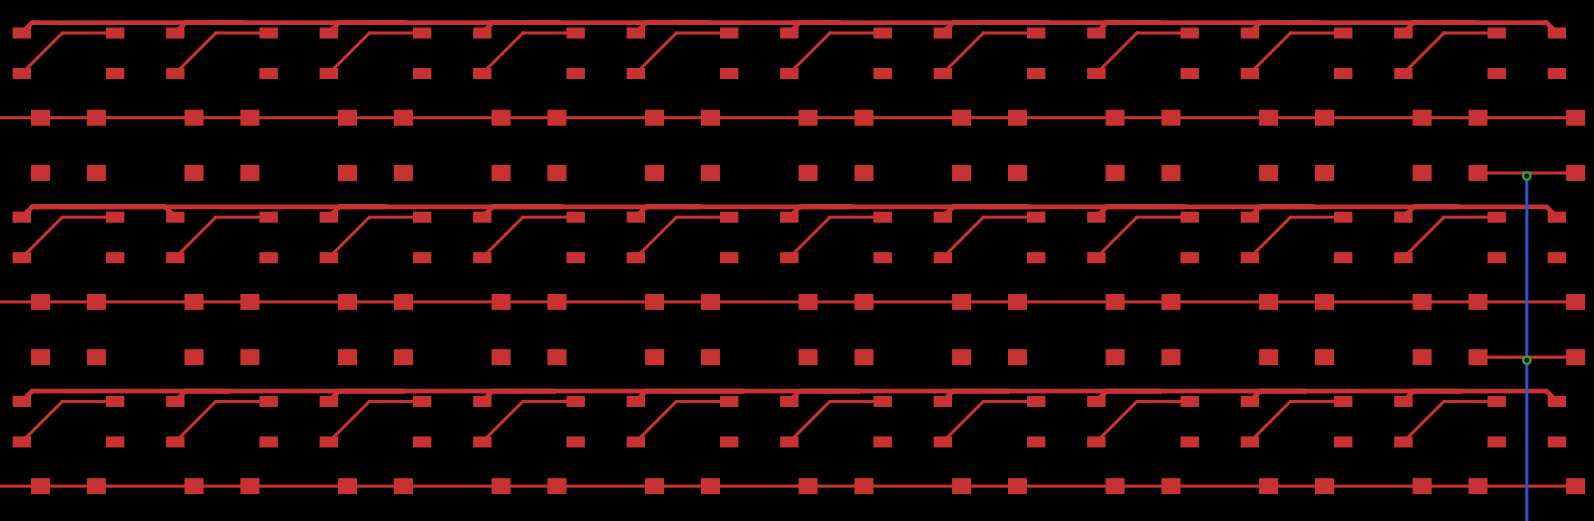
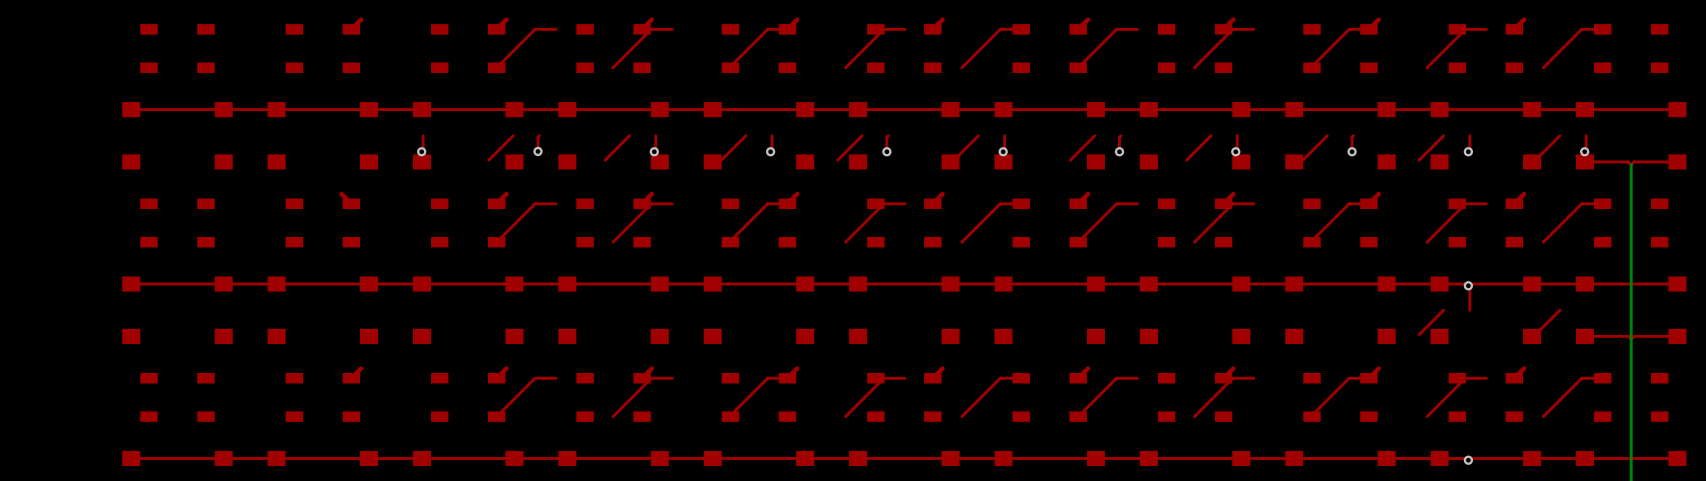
top track: (115, 32) (62, 32) (21, 73) -> none
top track: (268, 32) (215, 32) (175, 73) -> none
top track: (422, 32) (391, 32) -> none
top track: none -> (672, 29) (651, 29) (613, 67)
top track: (575, 32) (522, 32) (482, 73) -> none
top track: none -> (788, 29) (767, 29) (729, 67)
top track: (729, 32) (676, 32) (635, 73) -> none
top track: none -> (904, 29) (883, 29) (845, 67)
top track: (860, 32) (829, 32) (789, 73) -> (1000, 29) (961, 67)
top track: (1036, 32) (1005, 32) -> none
top track: none -> (1253, 29) (1232, 29) (1194, 67)
top track: (1189, 32) (1136, 32) (1096, 73) -> none
top track: none -> (1370, 29) (1349, 29) (1310, 67)
top track: (1343, 32) (1290, 32) (1249, 73) -> none
top track: none -> (1486, 29) (1465, 29) (1427, 67)
top track: (1474, 32) (1443, 32) (1403, 73) -> (1581, 29) (1543, 67)
top track: (1556, 32) (1546, 22) (32, 22) (21, 32) -> none
top track: none -> (423, 135) (421, 151)
top track: none -> (513, 135) (488, 160)
top track: none -> (539, 135) (537, 151)
top track: none -> (629, 135) (605, 160)
top track: none -> (655, 135) (654, 151)
top track: none -> (745, 135) (721, 160)
top track: none -> (772, 135) (770, 151)
top track: none -> (862, 135) (837, 160)
top track: none -> (888, 135) (886, 151)
top track: none -> (978, 135) (954, 160)
top track: none -> (1004, 135) (1003, 151)
top track: none -> (1094, 135) (1070, 160)
top track: none -> (1120, 135) (1119, 151)
top track: none -> (1211, 135) (1186, 160)
top track: none -> (1237, 135) (1235, 151)
top track: none -> (1327, 135) (1302, 160)
top track: none -> (1353, 135) (1352, 151)
top track: none -> (1443, 135) (1419, 160)
top track: none -> (1469, 135) (1468, 151)
top track: none -> (1559, 135) (1535, 160)
top track: none -> (1586, 135) (1584, 151)
via: none -> (537, 151)
via: none -> (421, 151)
via: none -> (654, 151)
via: none -> (770, 151)
via: none -> (886, 151)
via: none -> (1003, 151)
via: none -> (1119, 151)
via: none -> (1235, 151)
via: none -> (1352, 151)
via: none -> (1468, 151)
via position: (1526, 176) -> (1584, 151)
top track: (115, 217) (62, 217) (21, 257) -> none
top track: (268, 217) (215, 217) (175, 257) -> none
top track: (422, 217) (391, 217) -> none
top track: none -> (672, 203) (651, 203) (613, 242)
top track: (575, 217) (522, 217) (482, 257) -> none
top track: none -> (788, 203) (767, 203) (729, 242)
top track: (729, 217) (676, 217) (635, 257) -> none
top track: none -> (904, 203) (883, 203) (845, 242)
top track: (860, 217) (829, 217) (789, 257) -> (1000, 203) (961, 242)
top track: (1036, 217) (1005, 217) -> none
top track: none -> (1253, 203) (1232, 203) (1194, 242)
top track: (1189, 217) (1136, 217) (1096, 257) -> none
top track: none -> (1370, 203) (1349, 203) (1310, 242)
top track: (1343, 217) (1290, 217) (1249, 257) -> none
top track: none -> (1486, 203) (1465, 203) (1427, 242)
top track: (1474, 217) (1443, 217) (1403, 257) -> (1581, 203) (1543, 242)
top track: (1556, 217) (1546, 206) (32, 206) (21, 217) -> none
top track: none -> (1468, 285) (1469, 310)
via: none -> (1468, 285)
top track: none -> (1443, 310) (1419, 334)
top track: none -> (1559, 310) (1535, 334)
via: (1526, 360) -> none
top track: (115, 401) (62, 401) (21, 441) -> none
top track: (268, 401) (215, 401) (175, 441) -> none
top track: (422, 401) (391, 401) -> none
top track: none -> (672, 378) (651, 378) (613, 416)
top track: (575, 401) (522, 401) (482, 441) -> none
top track: none -> (788, 378) (767, 378) (729, 416)
top track: (729, 401) (676, 401) (635, 441) -> none
top track: none -> (904, 378) (883, 378) (845, 416)
top track: (860, 401) (829, 401) (789, 441) -> (1000, 378) (961, 416)
top track: (1036, 401) (1005, 401) -> none
top track: none -> (1253, 378) (1232, 378) (1194, 416)
top track: (1189, 401) (1136, 401) (1096, 441) -> none
top track: none -> (1370, 378) (1349, 378) (1310, 416)
top track: (1343, 401) (1290, 401) (1249, 441) -> none
top track: none -> (1486, 378) (1465, 378) (1427, 416)
top track: (1474, 401) (1443, 401) (1403, 441) -> (1581, 378) (1543, 416)
top track: (1556, 401) (1546, 391) (32, 391) (21, 401) -> none
via: none -> (1468, 460)

